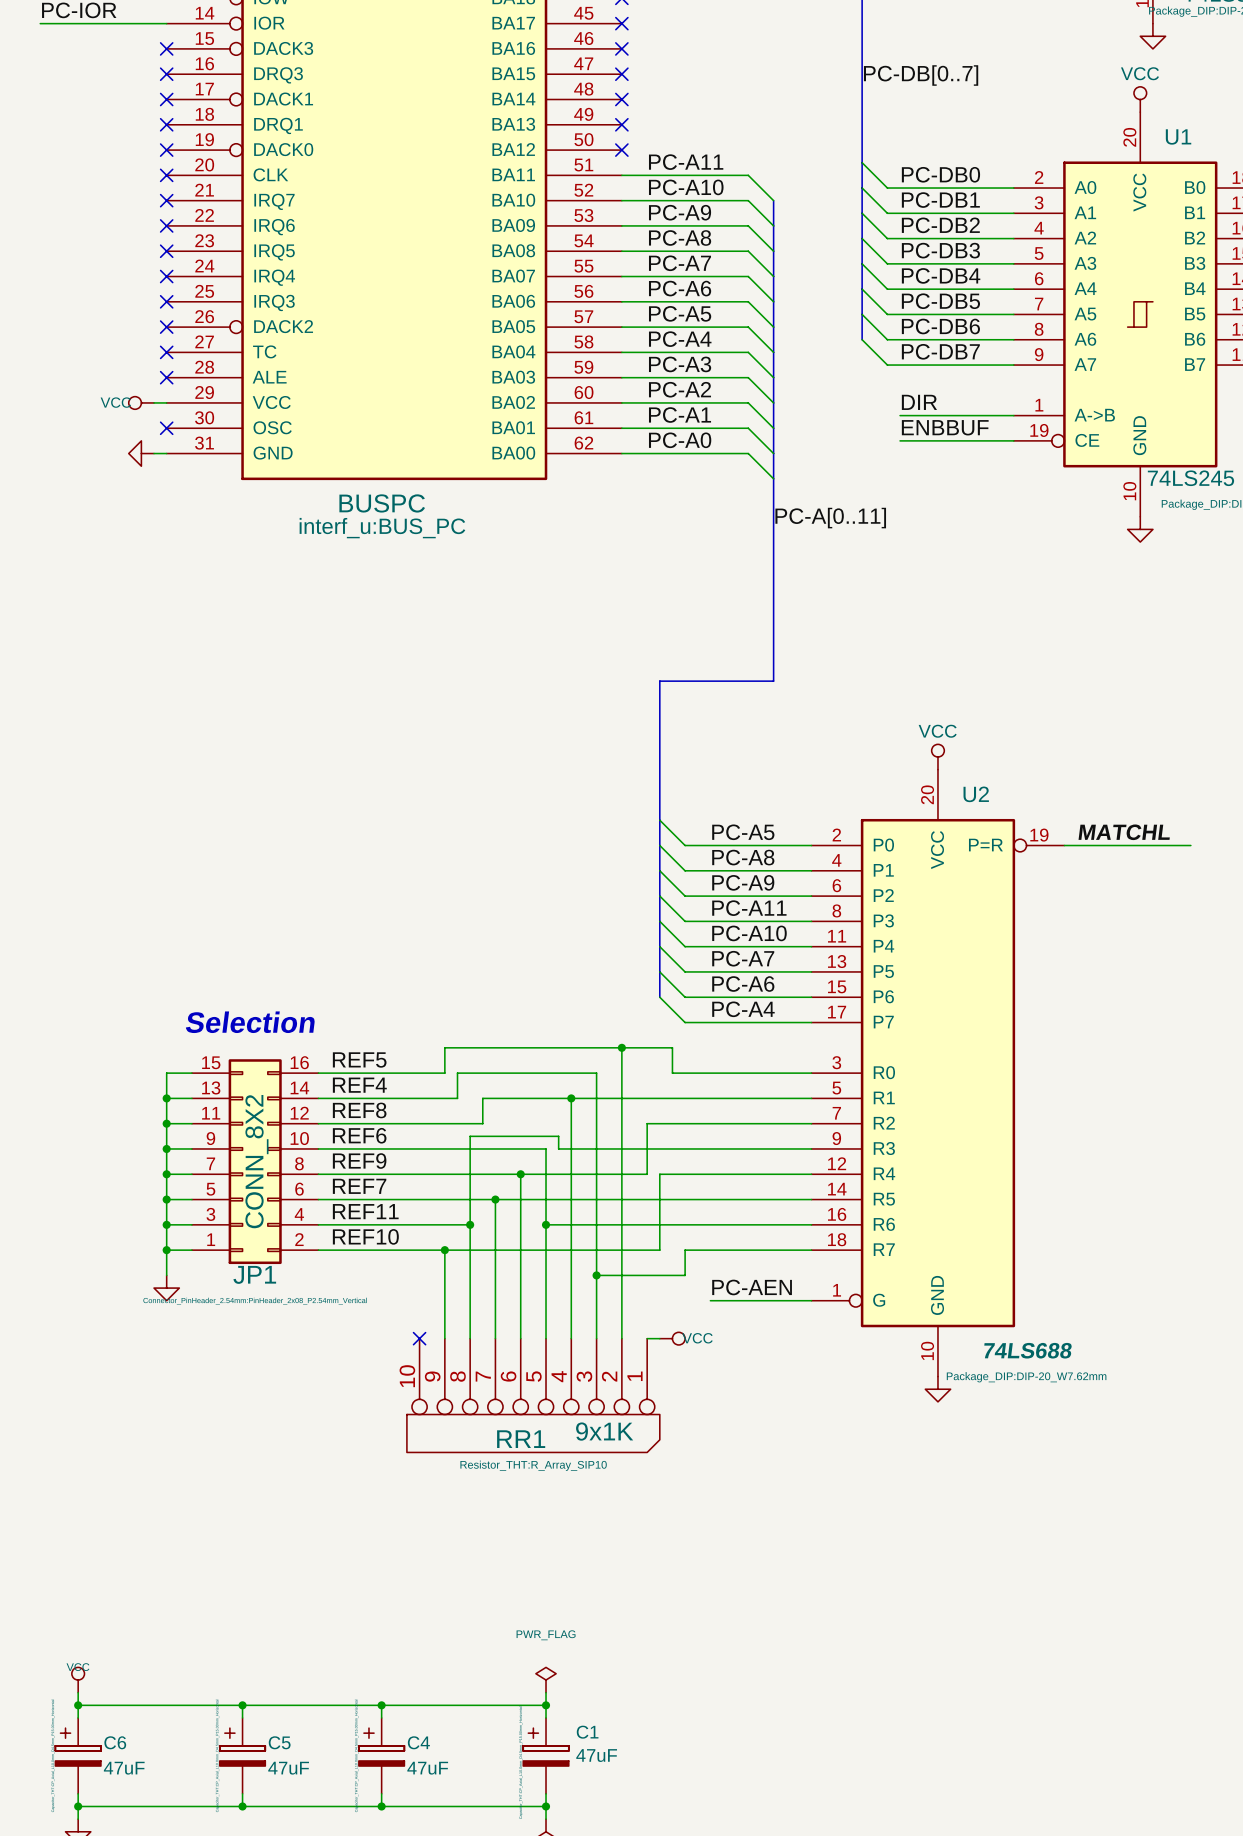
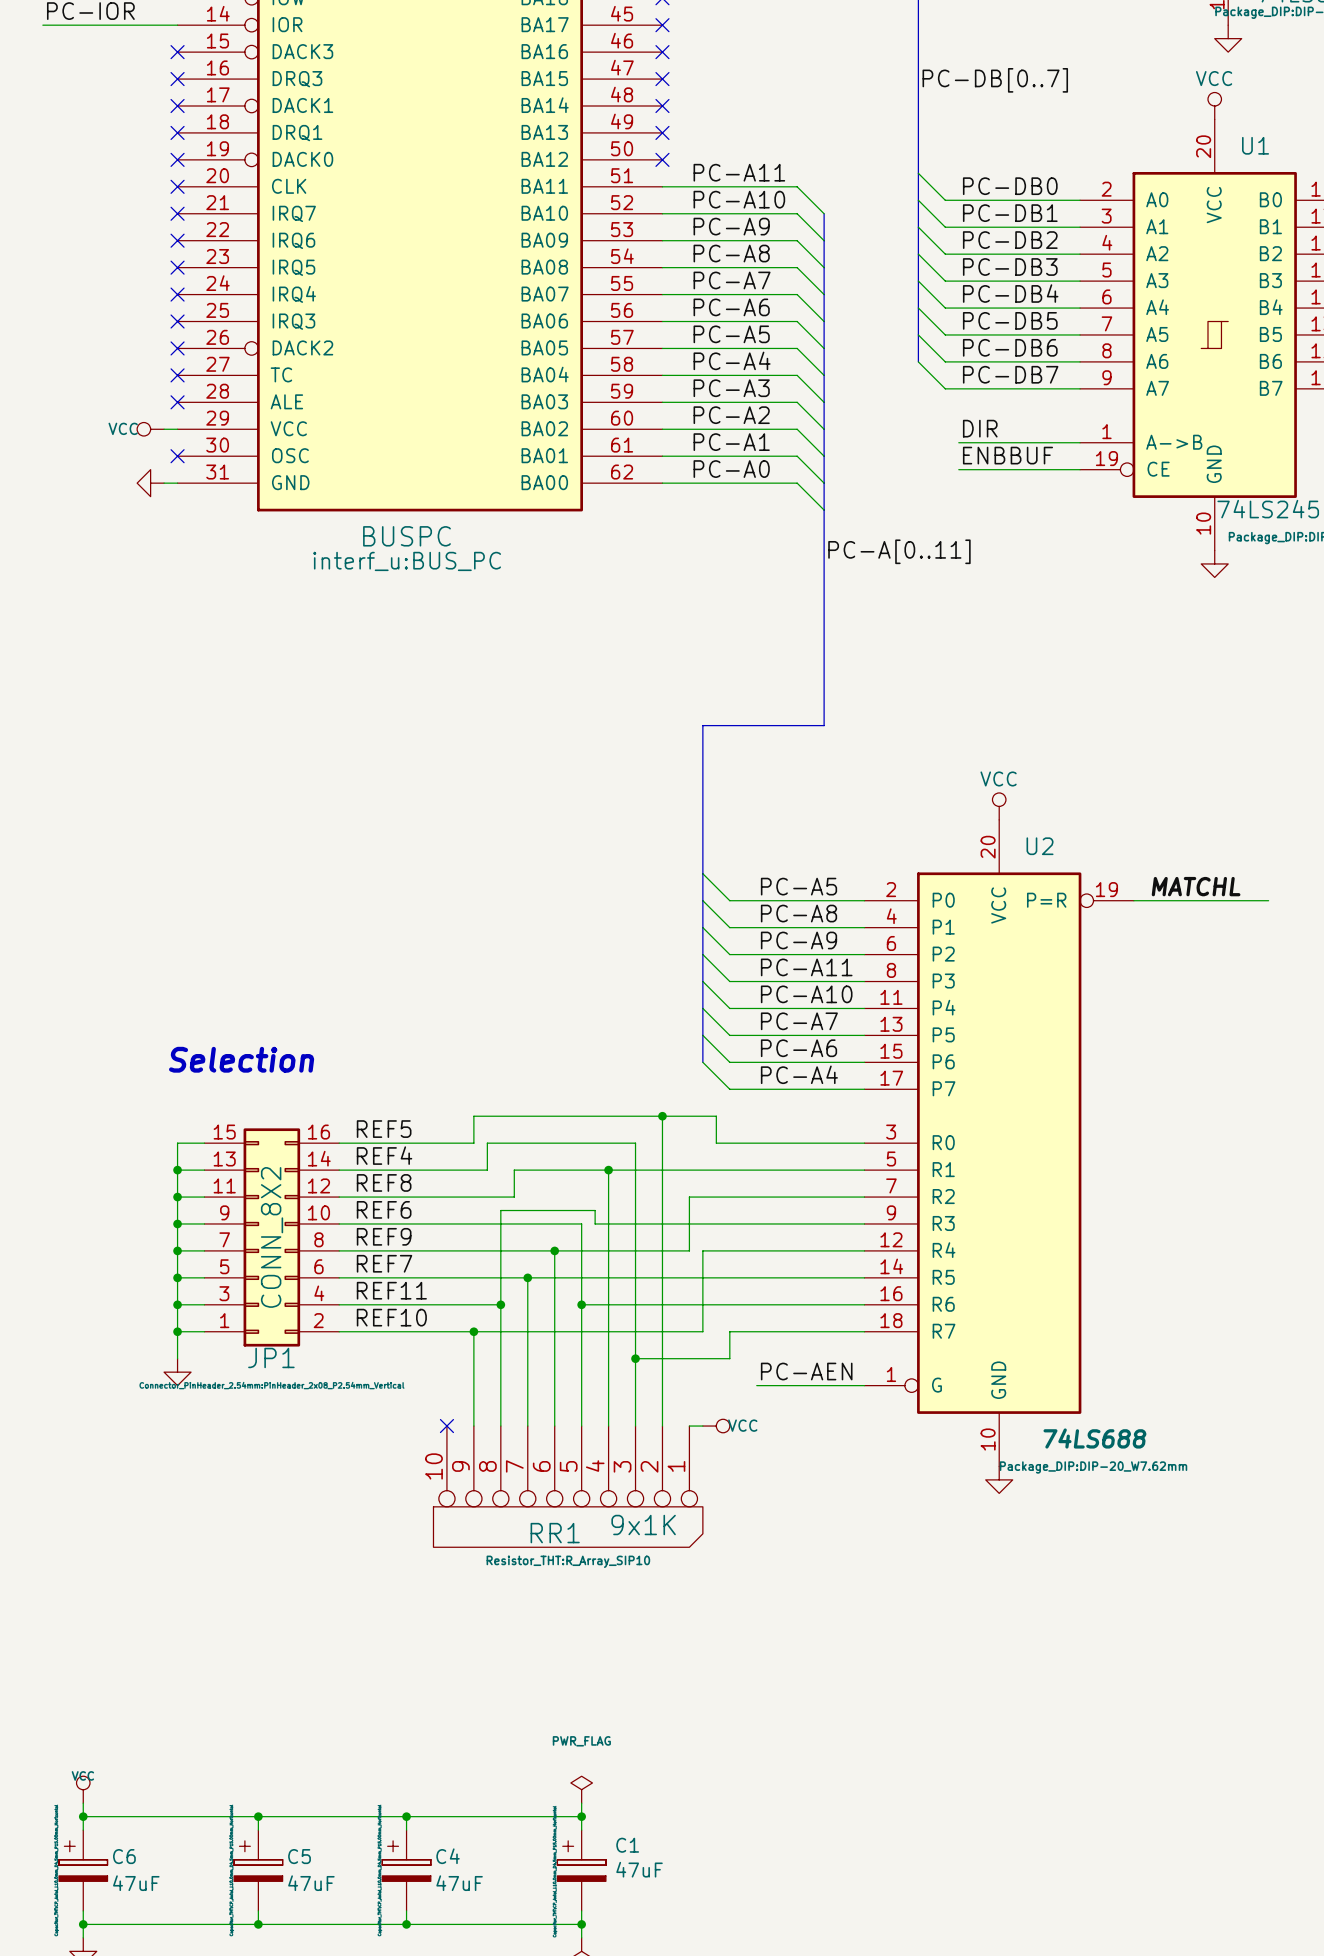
text position: Selection (250, 1022) -> Selection (241, 1059)

